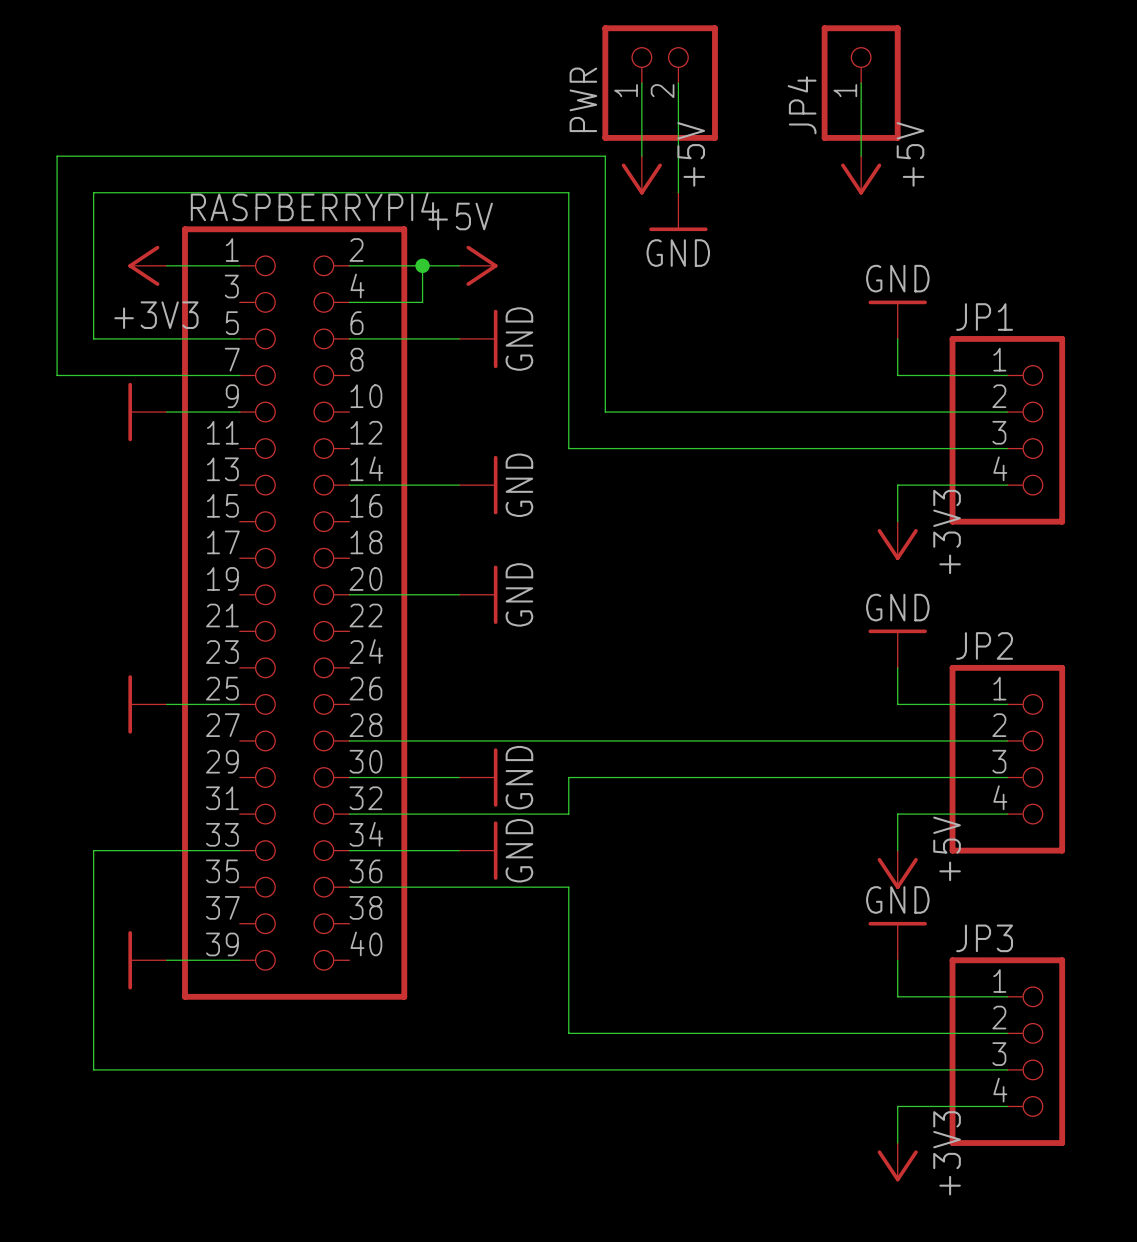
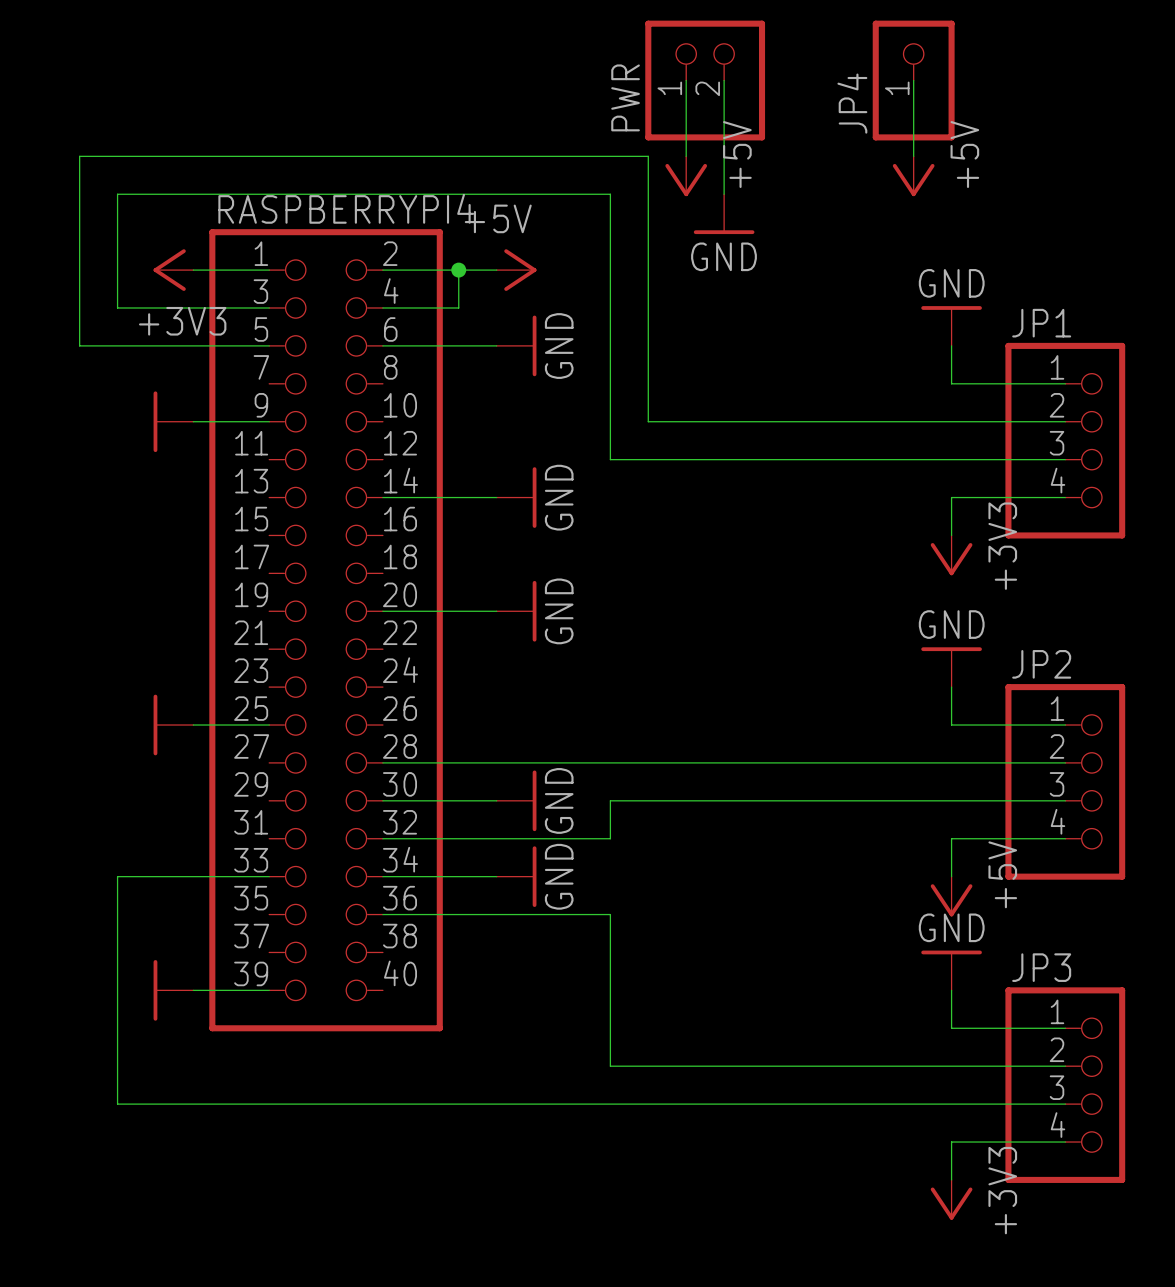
wire: (93, 302) (93, 338) -> (79, 345) (117, 345)
wire: none -> (117, 307) (269, 307)
wire: (57, 338) (57, 375) (239, 375) -> none

